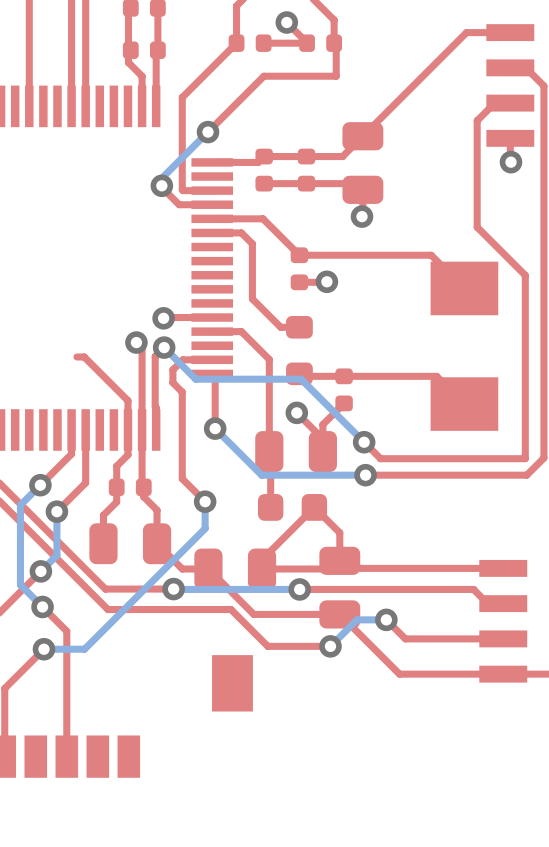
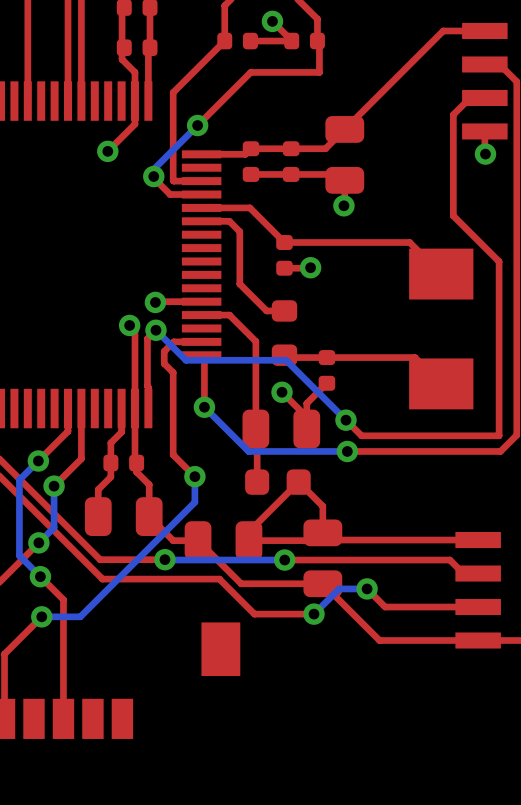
top track: none -> (134, 101) (134, 124) (107, 151)
via: none -> (107, 151)
top track: (76, 357) (84, 357) (127, 400) (127, 429) -> none

